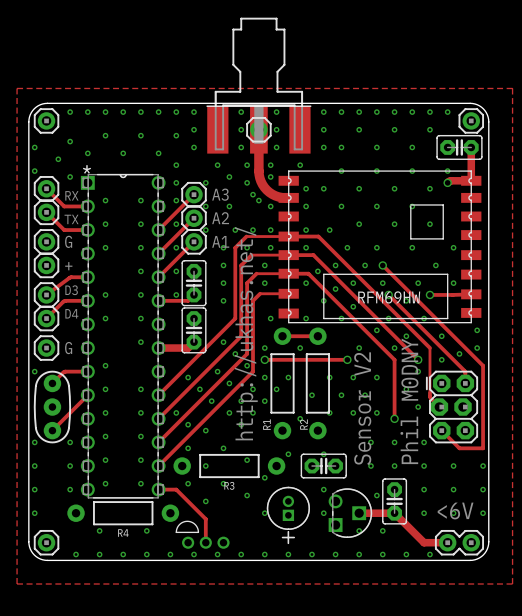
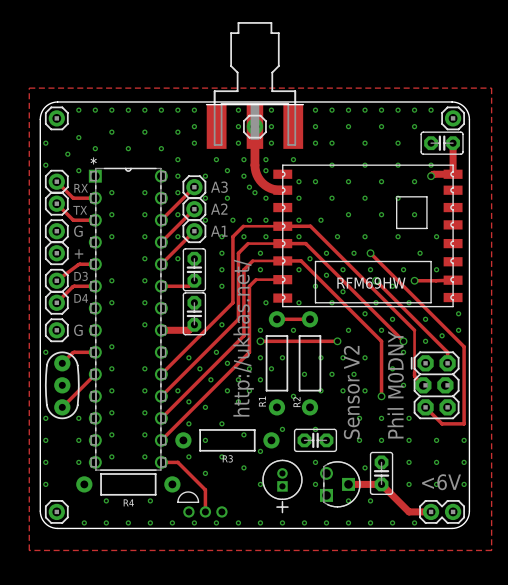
via: (176, 294) -> none
via: (235, 353) -> none
via: (247, 365) -> none

